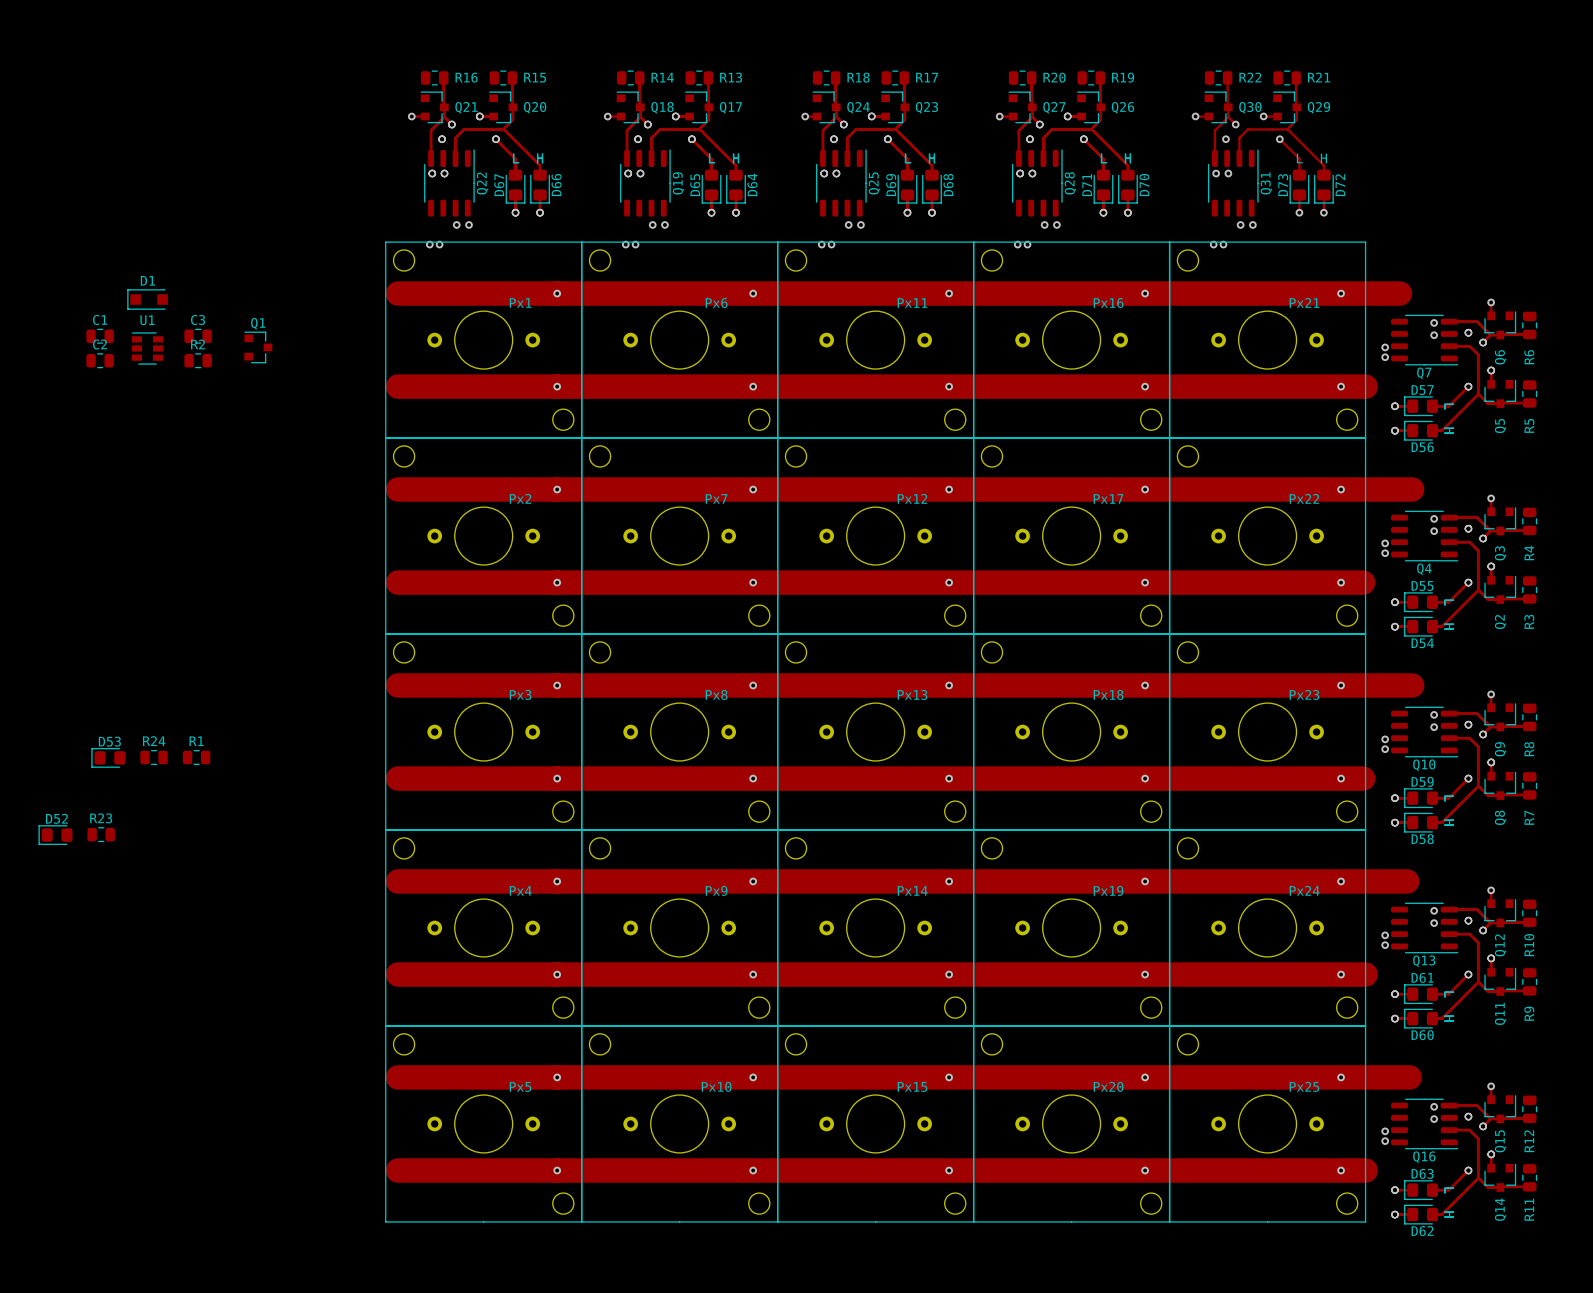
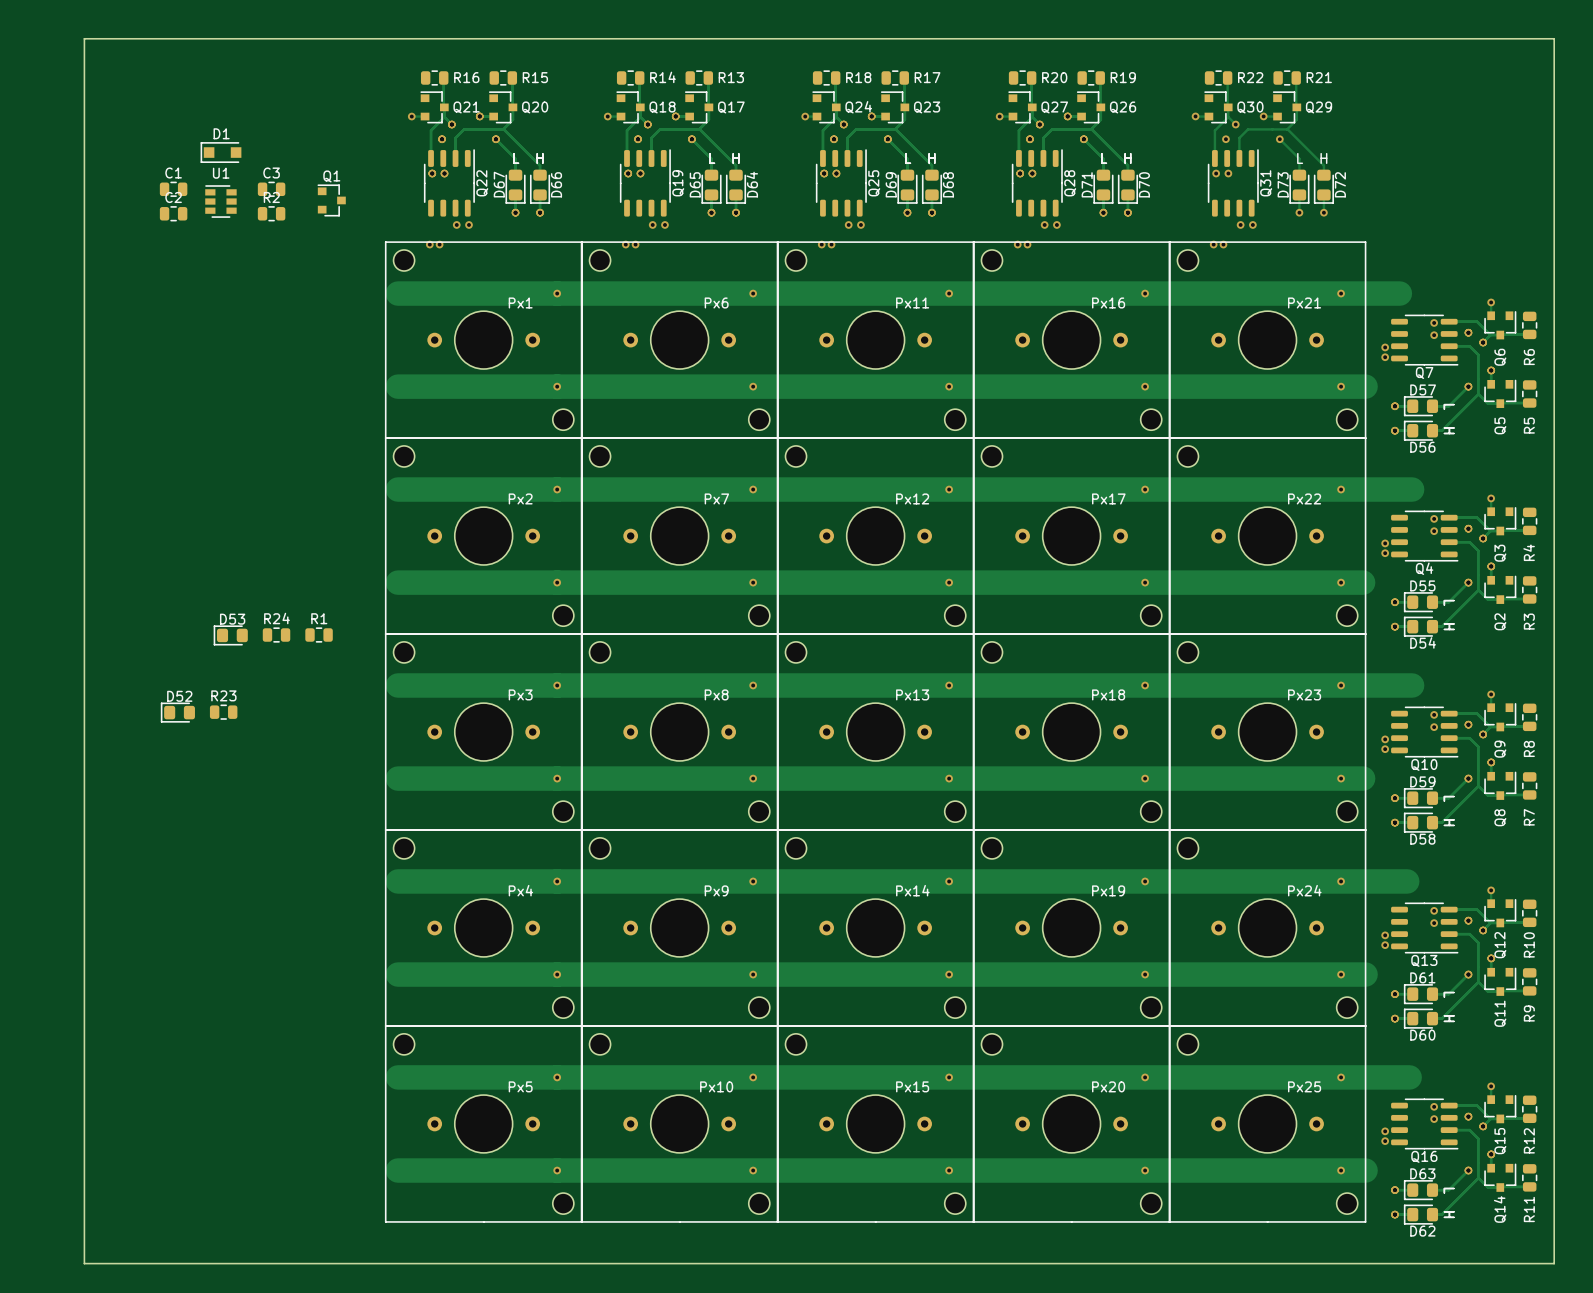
board edge: none -> (84, 38) (1554, 38) (1554, 1263) (84, 1263) (84, 38)
D1 position: (147, 299) -> (221, 152)
C1 position: (100, 336) -> (173, 189)
C3 position: (198, 336) -> (271, 189)
Q1 position: (258, 347) -> (331, 200)
U1 position: (147, 348) -> (220, 201)
C2 position: (100, 360) -> (173, 213)
R2 position: (198, 360) -> (271, 213)
D53 position: (108, 757) -> (230, 635)
R24 position: (154, 757) -> (276, 635)
R1 position: (196, 757) -> (319, 635)
R23 position: (101, 834) -> (223, 712)
D52 position: (55, 835) -> (178, 712)

